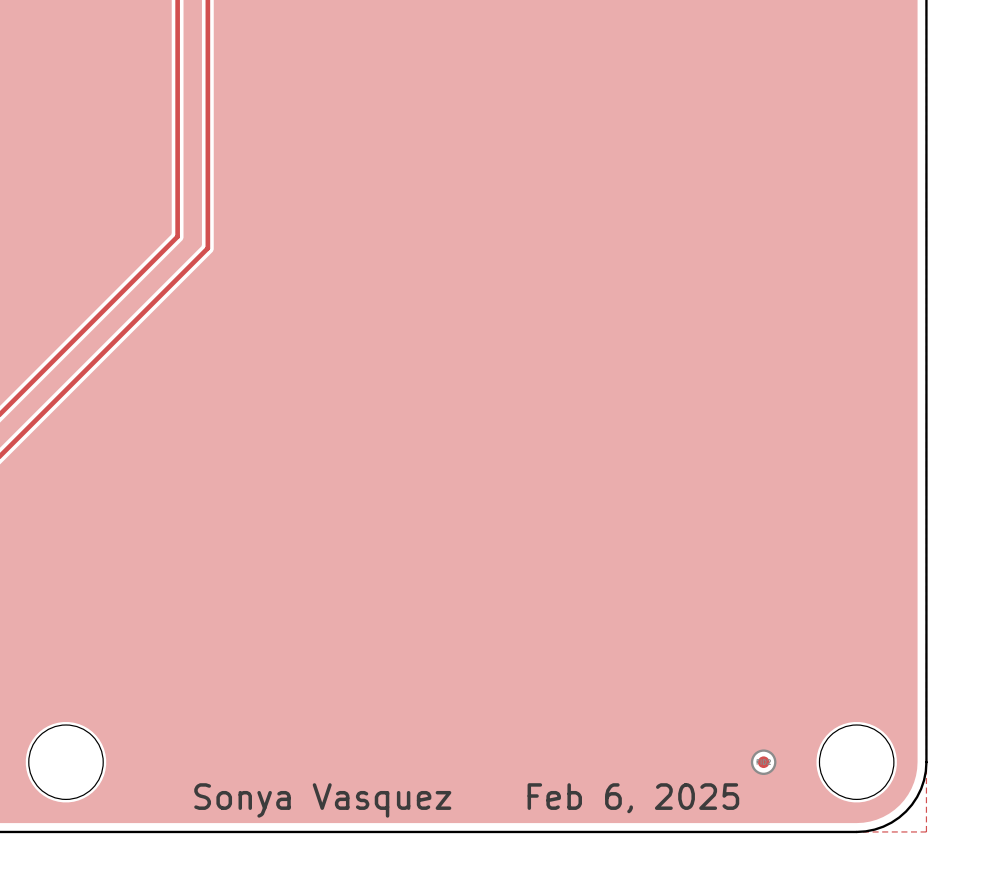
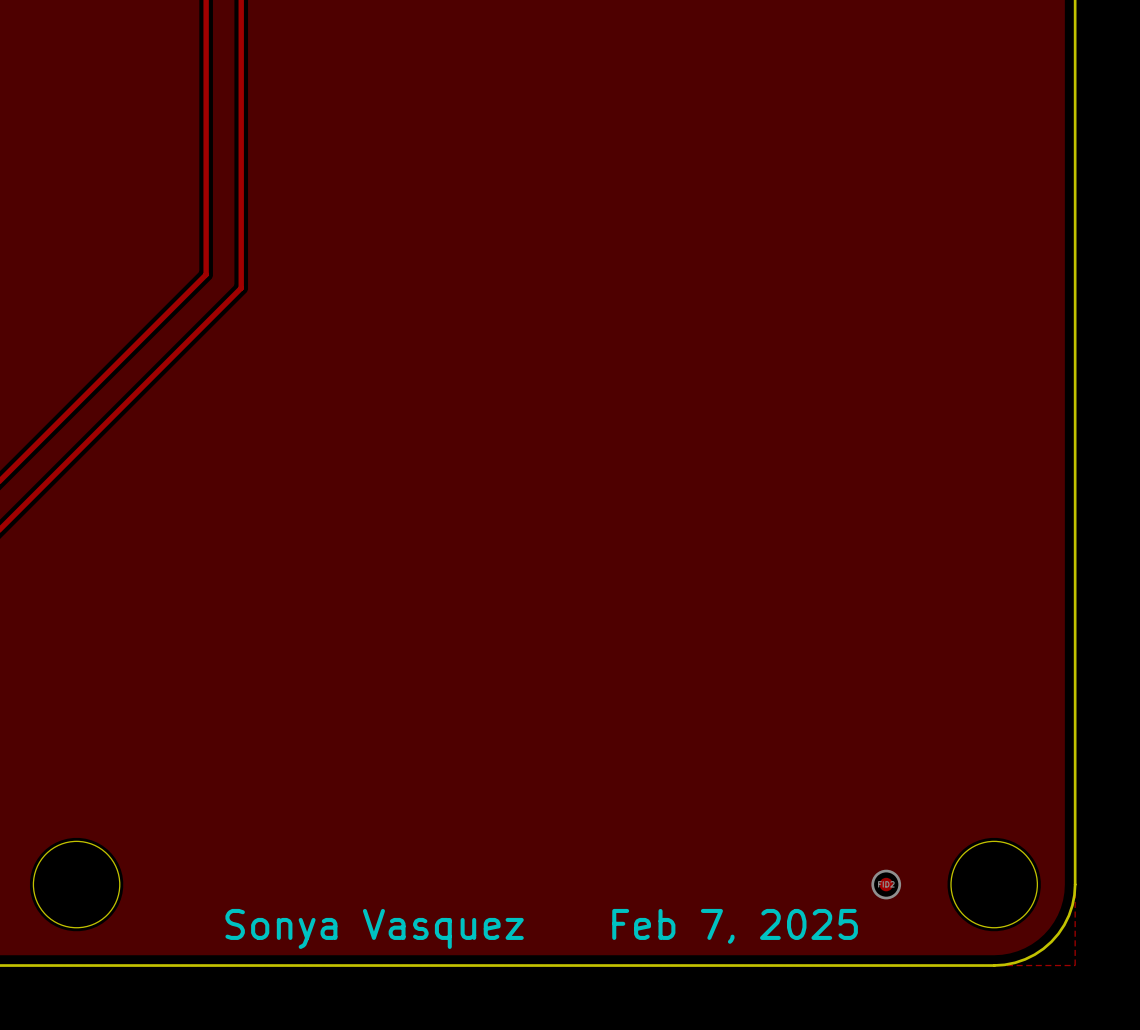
text: Sonya Vasquez Feb 6, 2025 (466, 800) -> Sonya Vasquez Feb 7, 2025 (541, 928)

